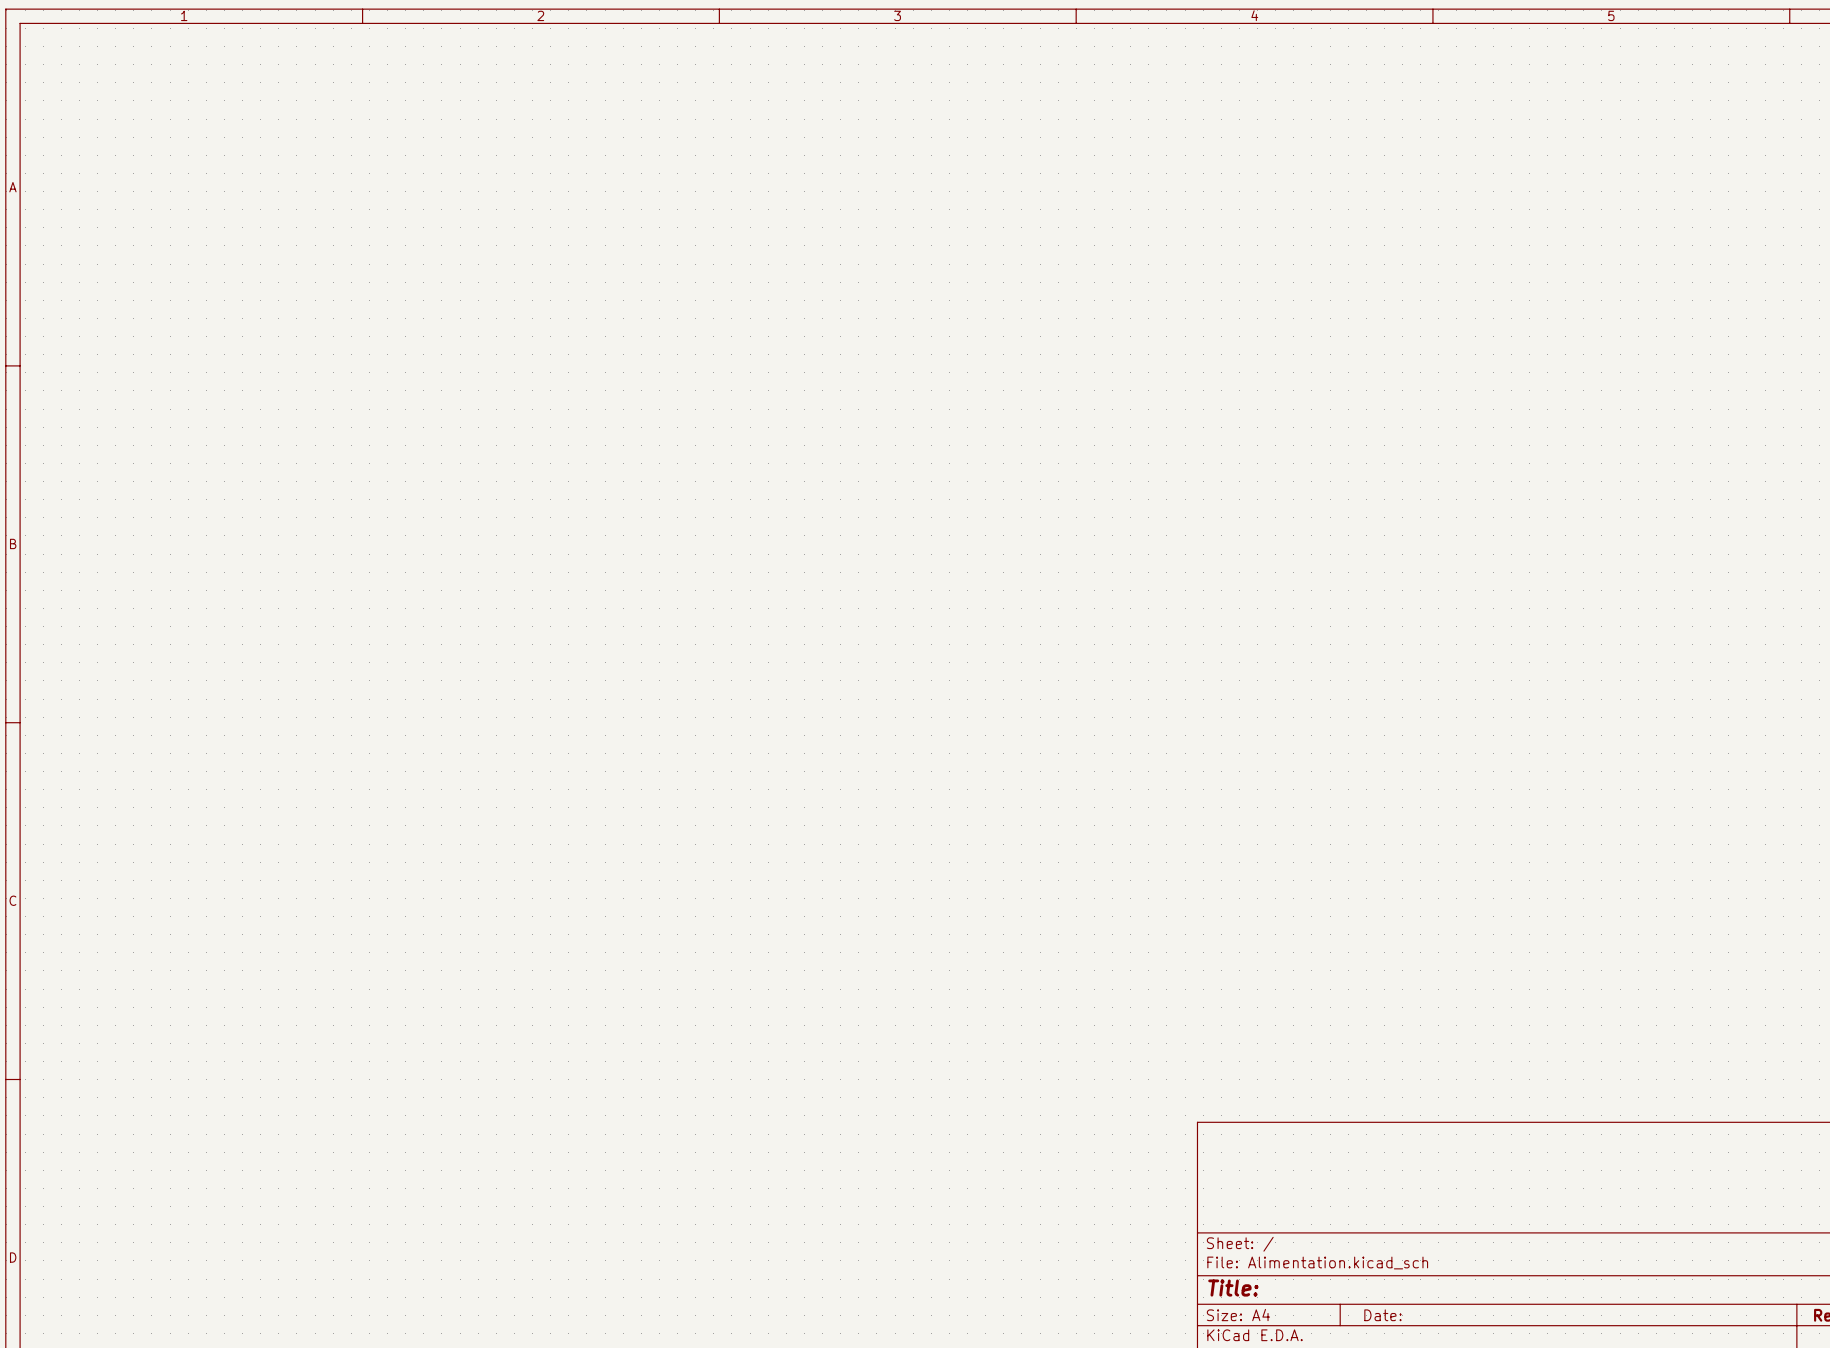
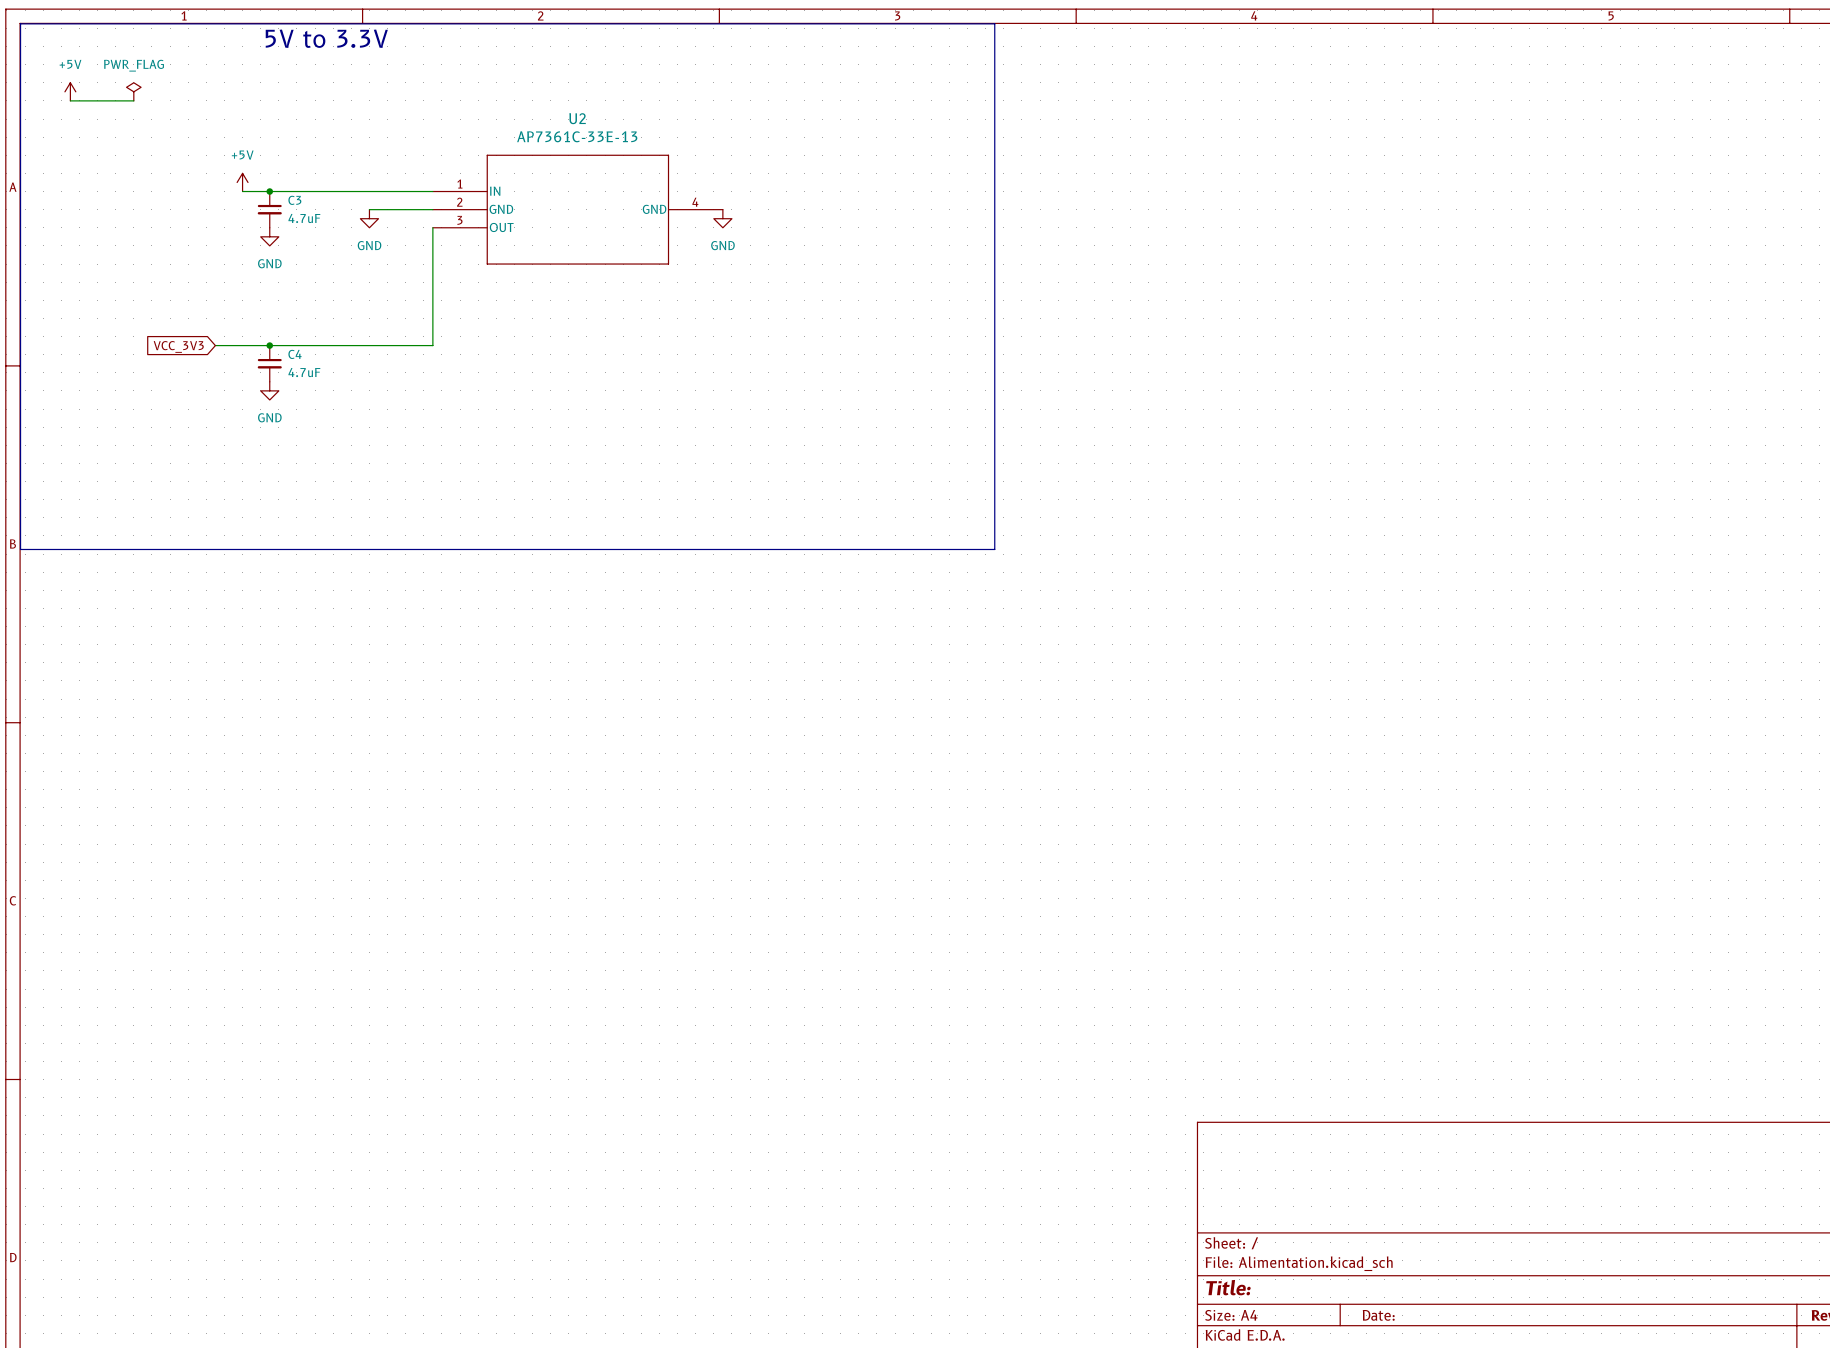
line: none -> (20, 23) (994, 23) (994, 549) (20, 549) (20, 23)
text: none -> 5V to 3.3V (326, 38)
power symbol: none -> +5V (70, 91)
power symbol: none -> PWR_FLAG (133, 91)
wire: none -> (70, 100) (133, 100)
power symbol: none -> +5V (242, 182)
wire: none -> (242, 191) (432, 191)
junction: none -> (269, 191)
C3: none -> 4.7uF (269, 209)
wire: none -> (369, 209) (432, 209)
U2: none -> AP7361C-33E-13 (577, 209)
power symbol: none -> GND (369, 218)
power symbol: none -> GND (722, 218)
wire: none -> (432, 227) (432, 345) (215, 345)
power symbol: none -> GND (269, 236)
junction: none -> (269, 345)
global label: none -> VCC_3V3 (178, 346)
C4: none -> 4.7uF (269, 363)
power symbol: none -> GND (269, 390)

